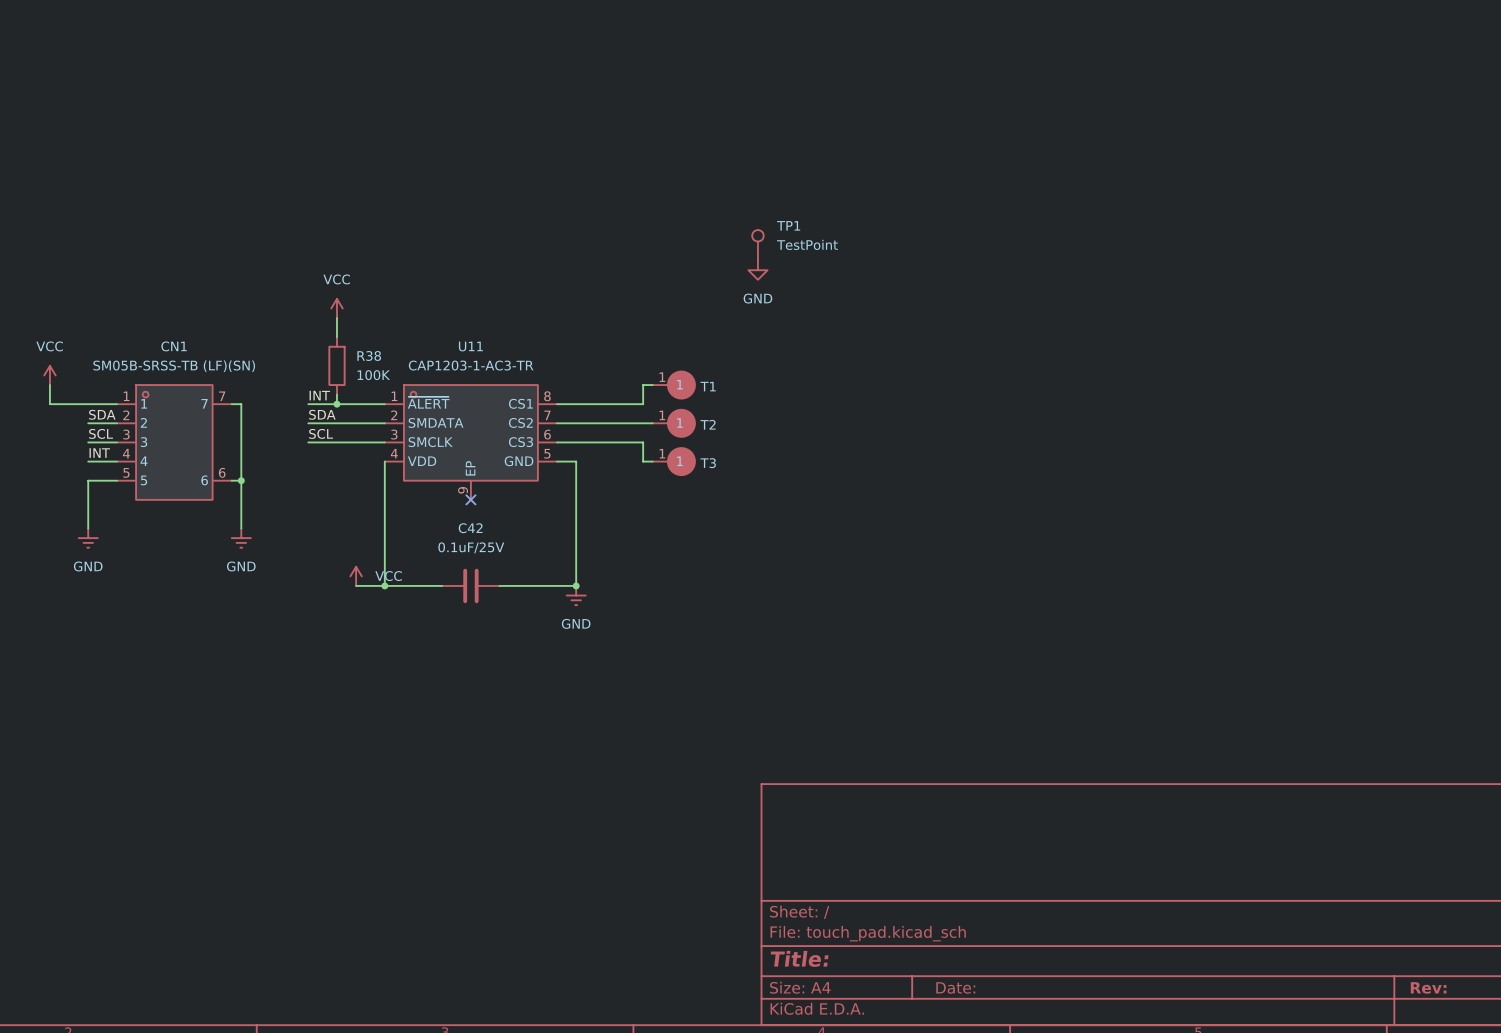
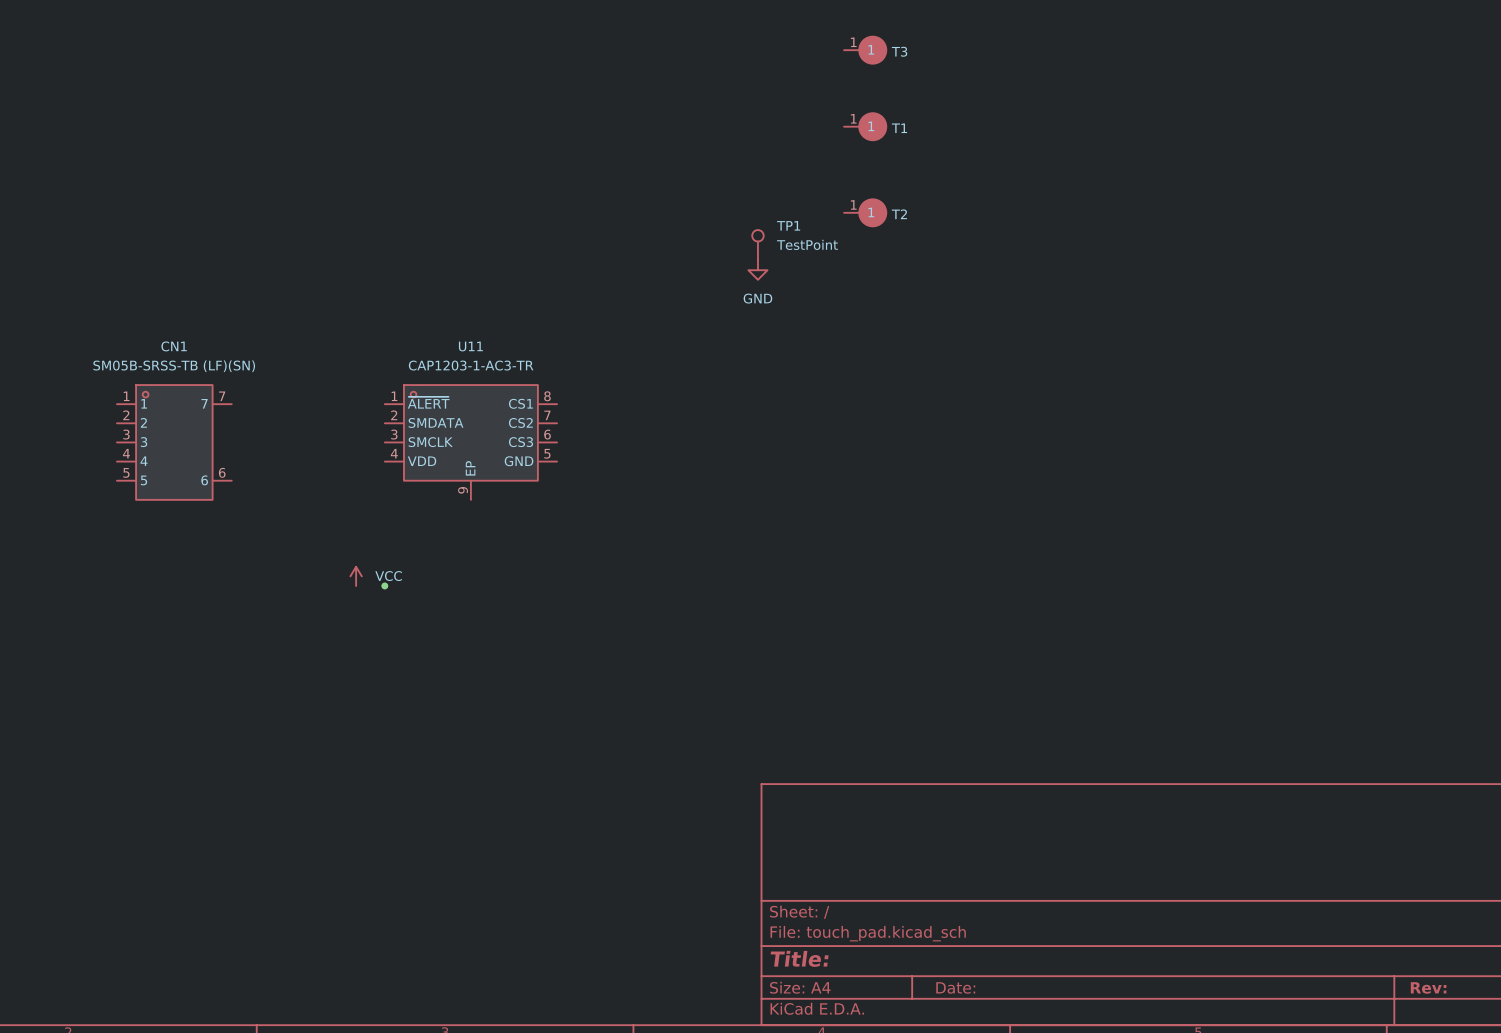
power symbol: VCC (336, 308) -> none
wire: (336, 318) (336, 337) -> none
R38: 100K (336, 365) -> none
power symbol: VCC (49, 375) -> none
wire: (49, 385) (49, 404) (116, 404) -> none
wire: (652, 385) (643, 385) (643, 404) (557, 404) -> none
T1 position: (673, 385) -> (865, 126)
wire: (336, 394) (336, 404) -> none
label: INT (319, 395) -> none
wire: (231, 404) (241, 404) (241, 528) -> none
wire: (308, 404) (384, 404) -> none
junction: (336, 404) -> none
label: SDA (102, 414) -> none
label: SDA (322, 414) -> none
wire: (88, 423) (116, 423) -> none
wire: (308, 423) (384, 423) -> none
wire: (557, 423) (652, 423) -> none
T2 position: (673, 423) -> (865, 212)
label: SCL (101, 433) -> none
label: SCL (321, 433) -> none
wire: (88, 442) (116, 442) -> none
wire: (308, 442) (384, 442) -> none
wire: (557, 442) (643, 442) (643, 461) (652, 461) -> none
label: INT (99, 453) -> none
wire: (88, 461) (116, 461) -> none
wire: (384, 461) (384, 585) -> none
wire: (557, 461) (576, 461) (576, 585) (499, 585) -> none
T3 position: (673, 461) -> (865, 50)
wire: (116, 480) (88, 480) (88, 528) -> none
wire: (231, 480) (241, 480) -> none
junction: (241, 480) -> none
no-connect mark: (470, 499) -> none
power symbol: GND (88, 538) -> none
power symbol: GND (241, 538) -> none
wire: (356, 585) (442, 585) -> none
C42: 0.1uF/25V (470, 585) -> none
junction: (576, 585) -> none
power symbol: GND (576, 595) -> none

